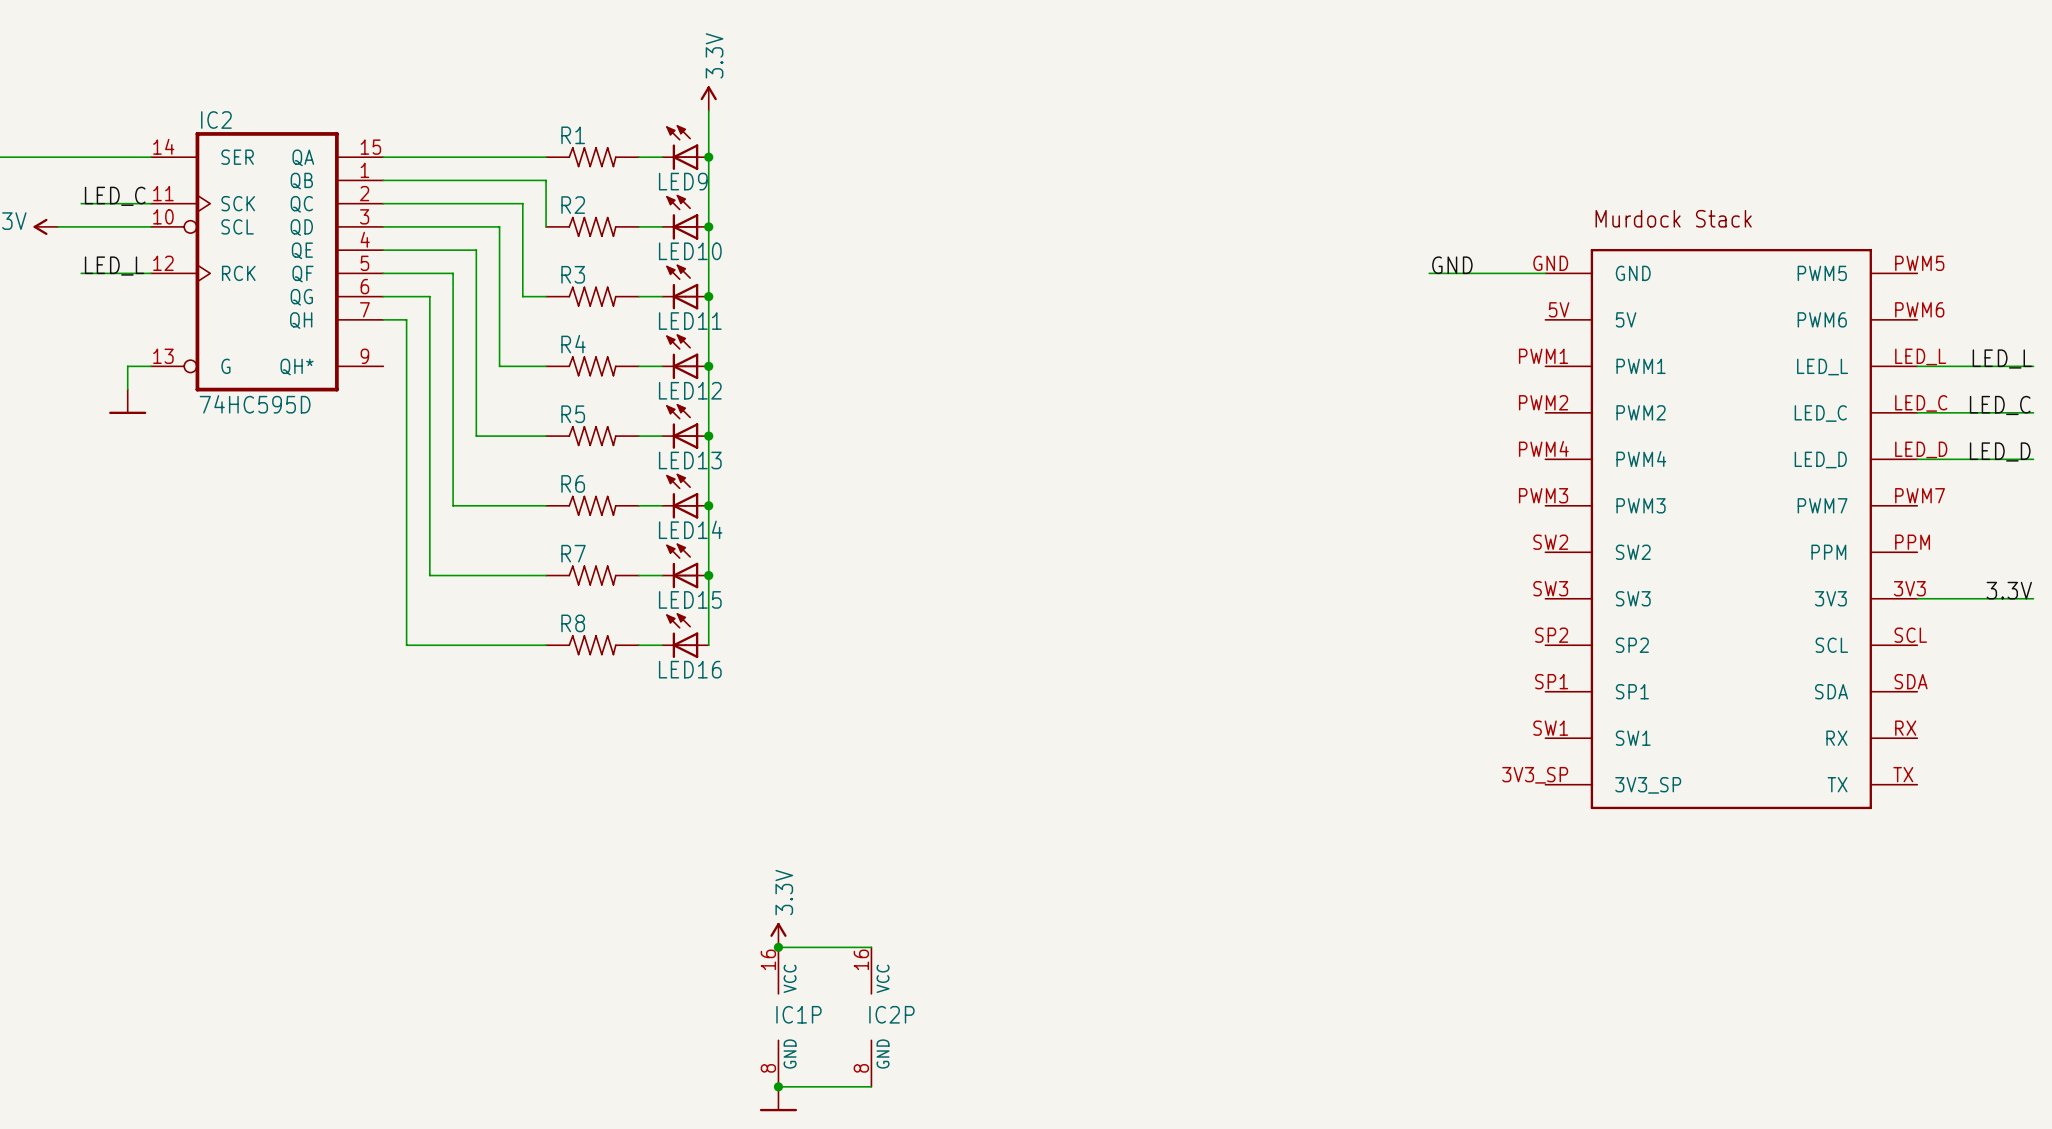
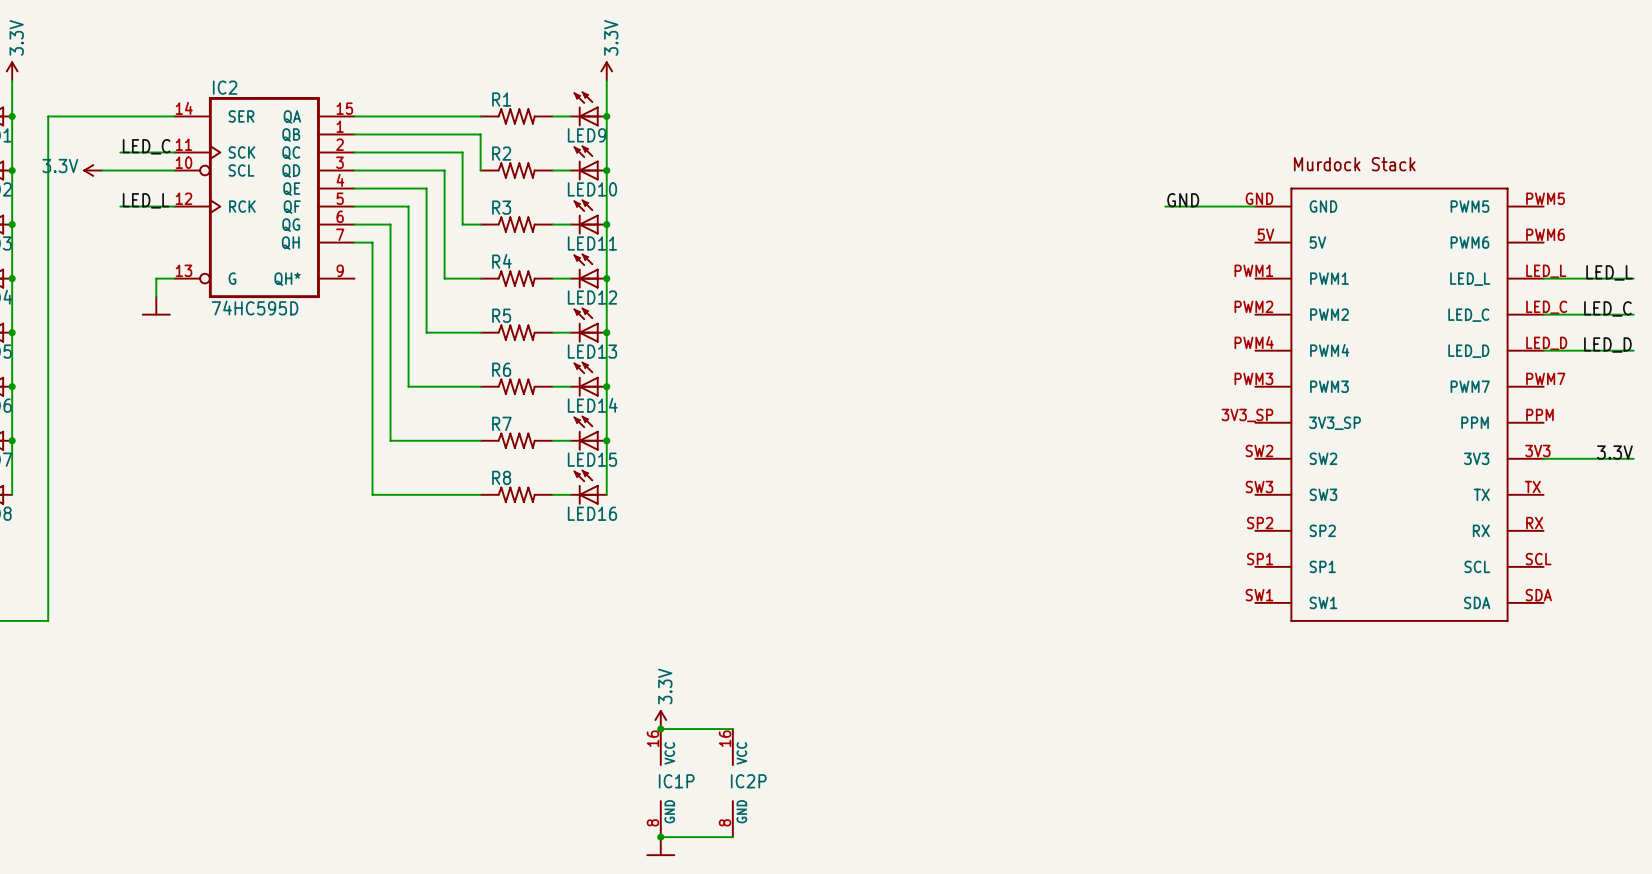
part symbol: [1545, 248, 1918, 810] -> [1255, 187, 1544, 622]

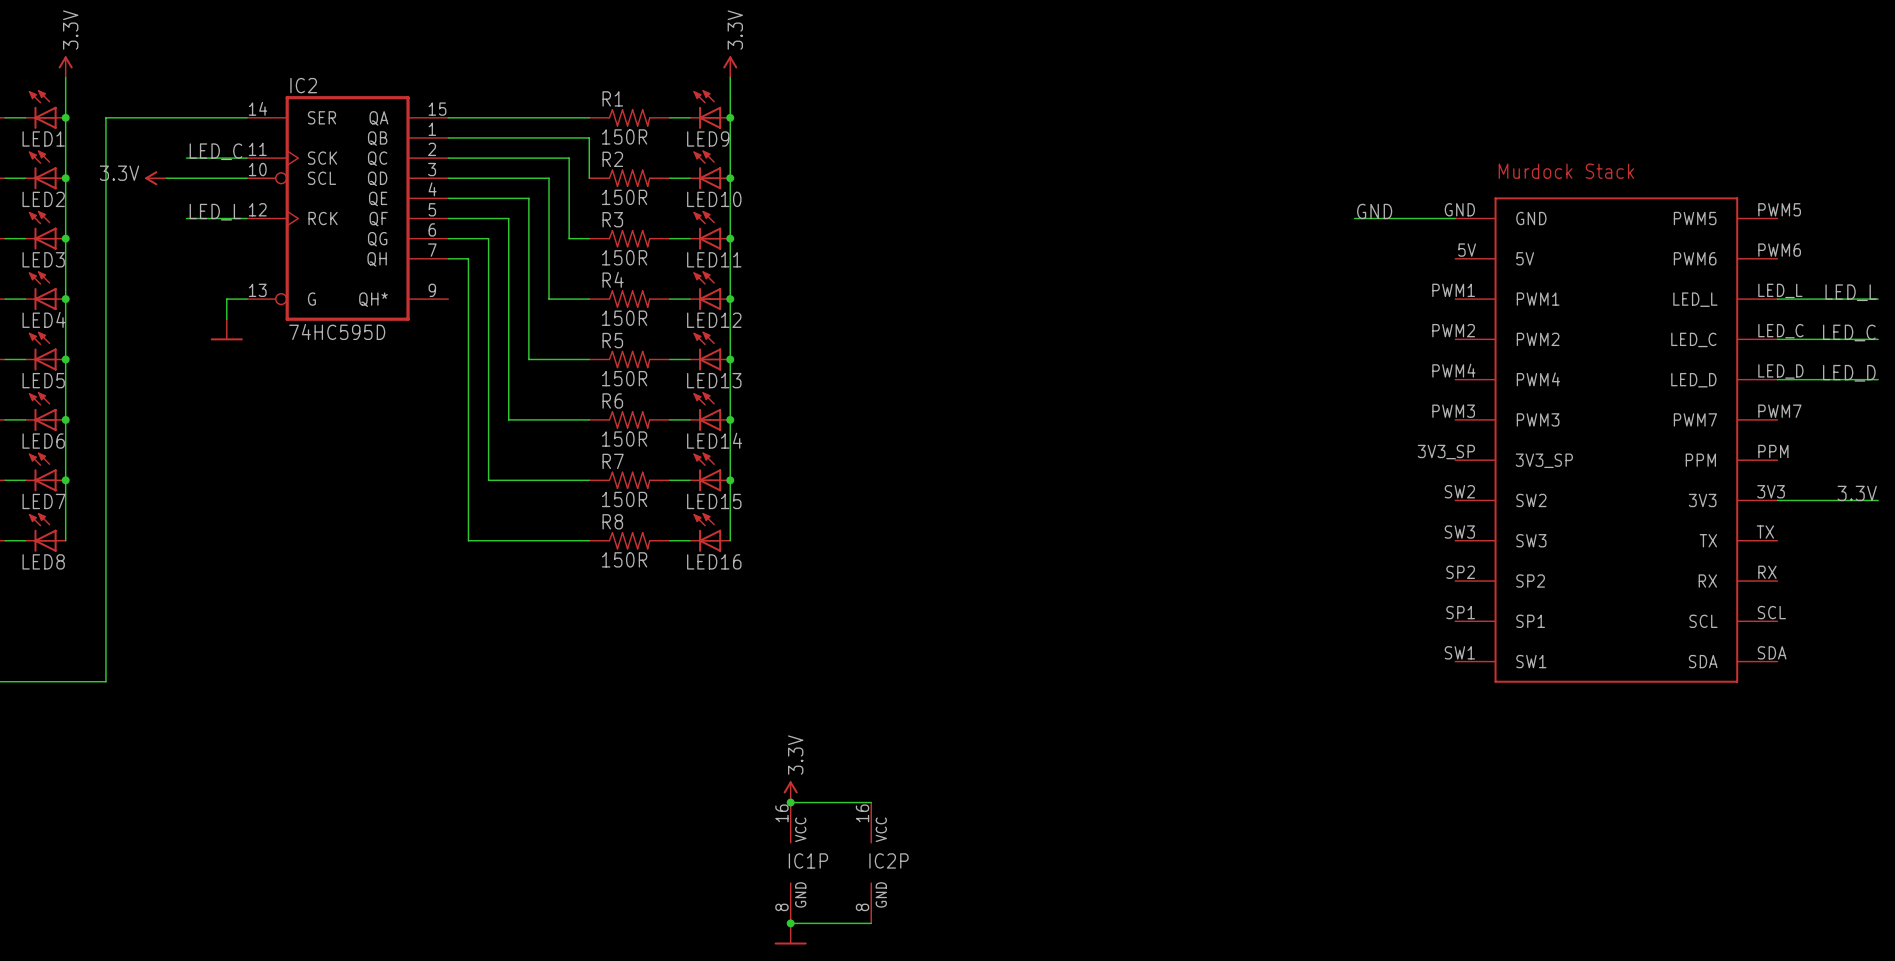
R1 value: none -> 150R (624, 136)
R2 value: none -> 150R (624, 197)
R3 value: none -> 150R (624, 257)
R4 value: none -> 150R (624, 318)
R5 value: none -> 150R (624, 378)
R6 value: none -> 150R (624, 439)
R7 value: none -> 150R (624, 499)
R8 value: none -> 150R (624, 559)

